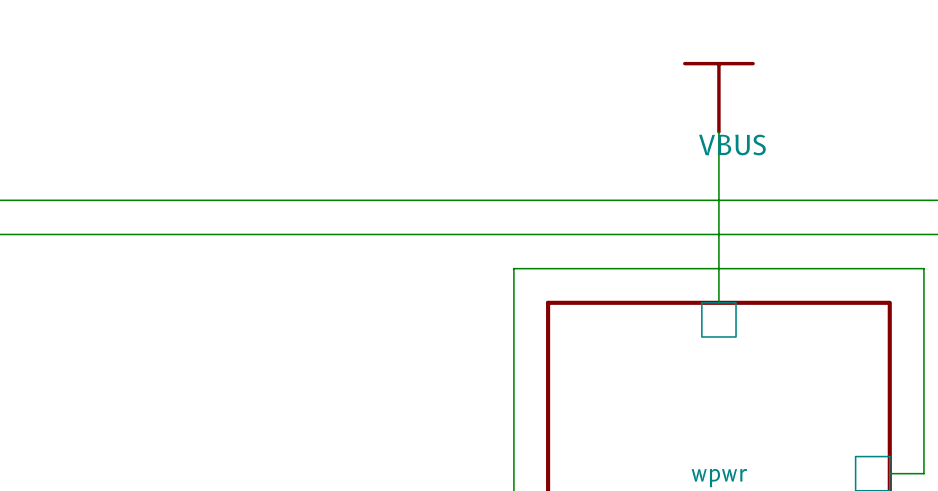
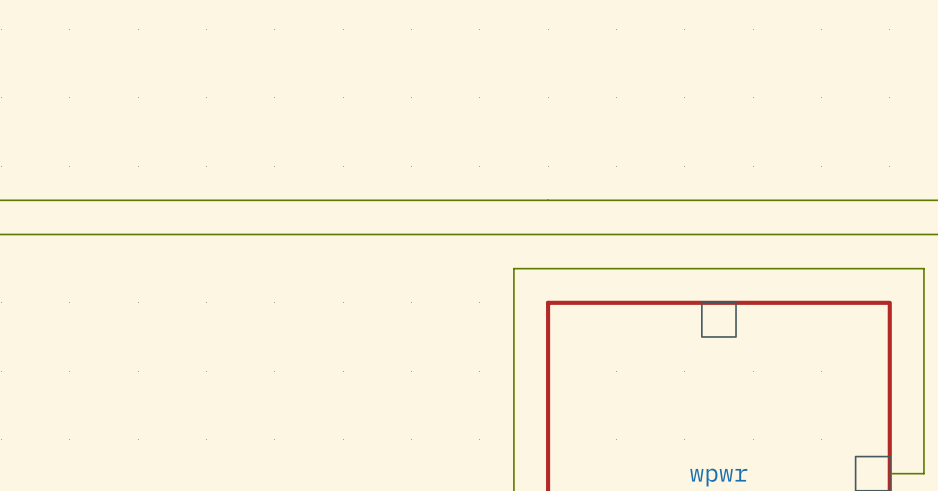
power symbol: VBUS (718, 97) -> none
wire: (718, 131) (718, 302) -> none

